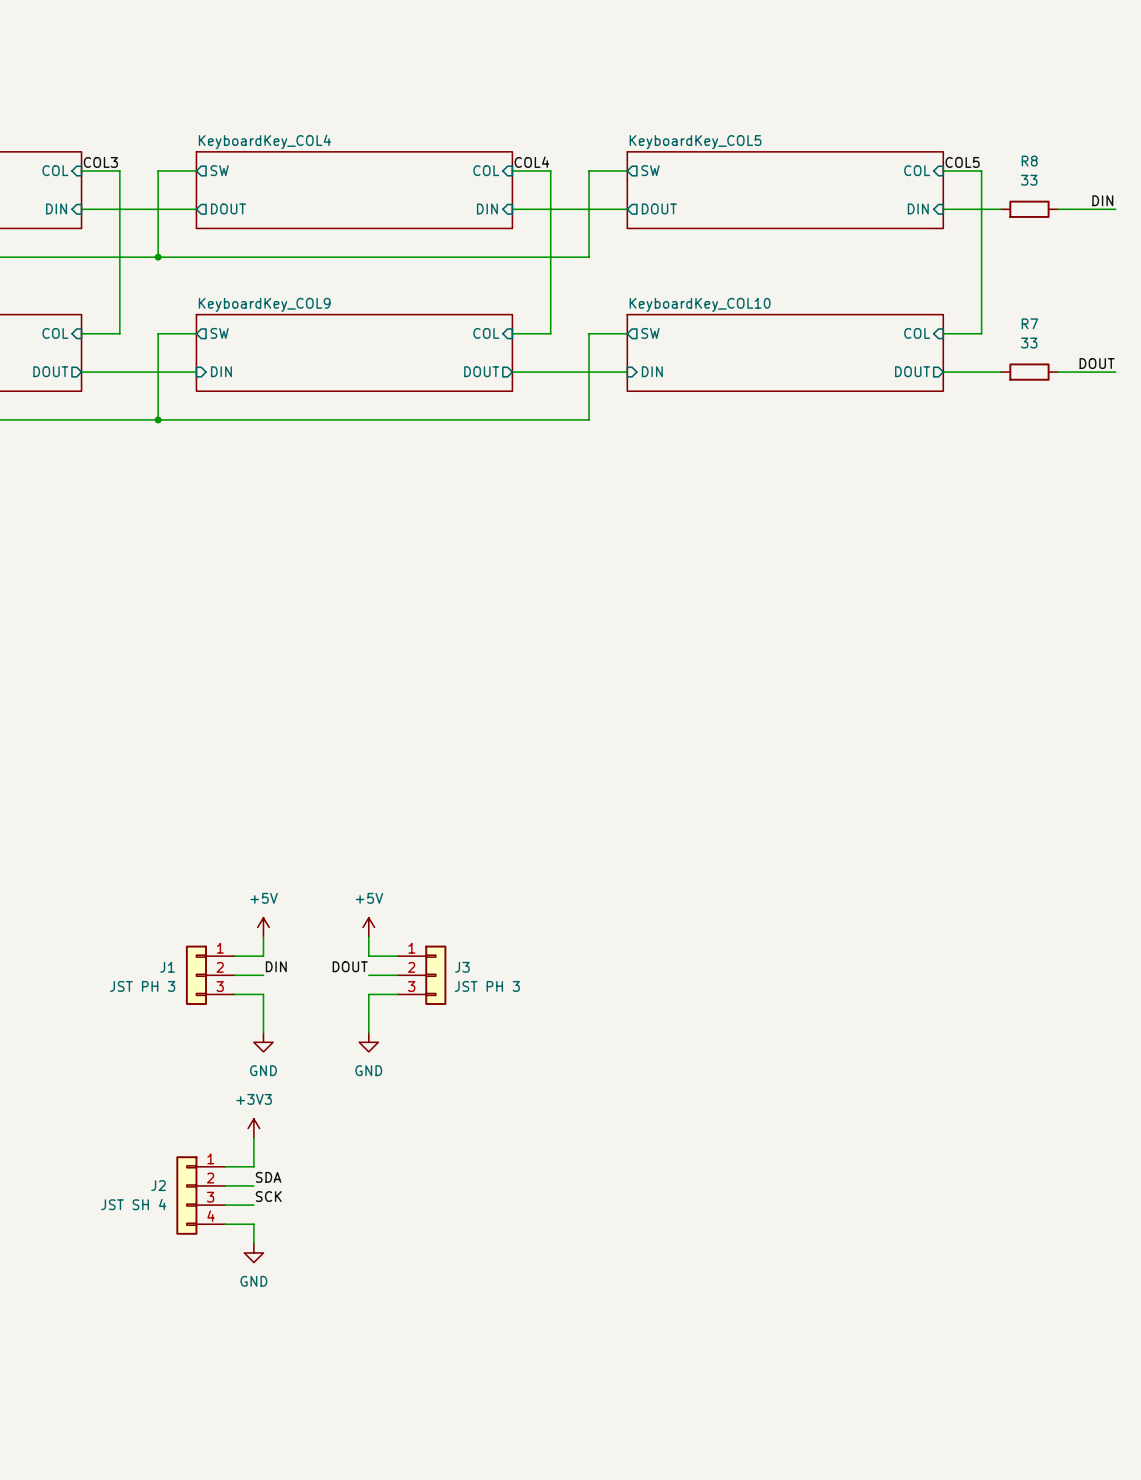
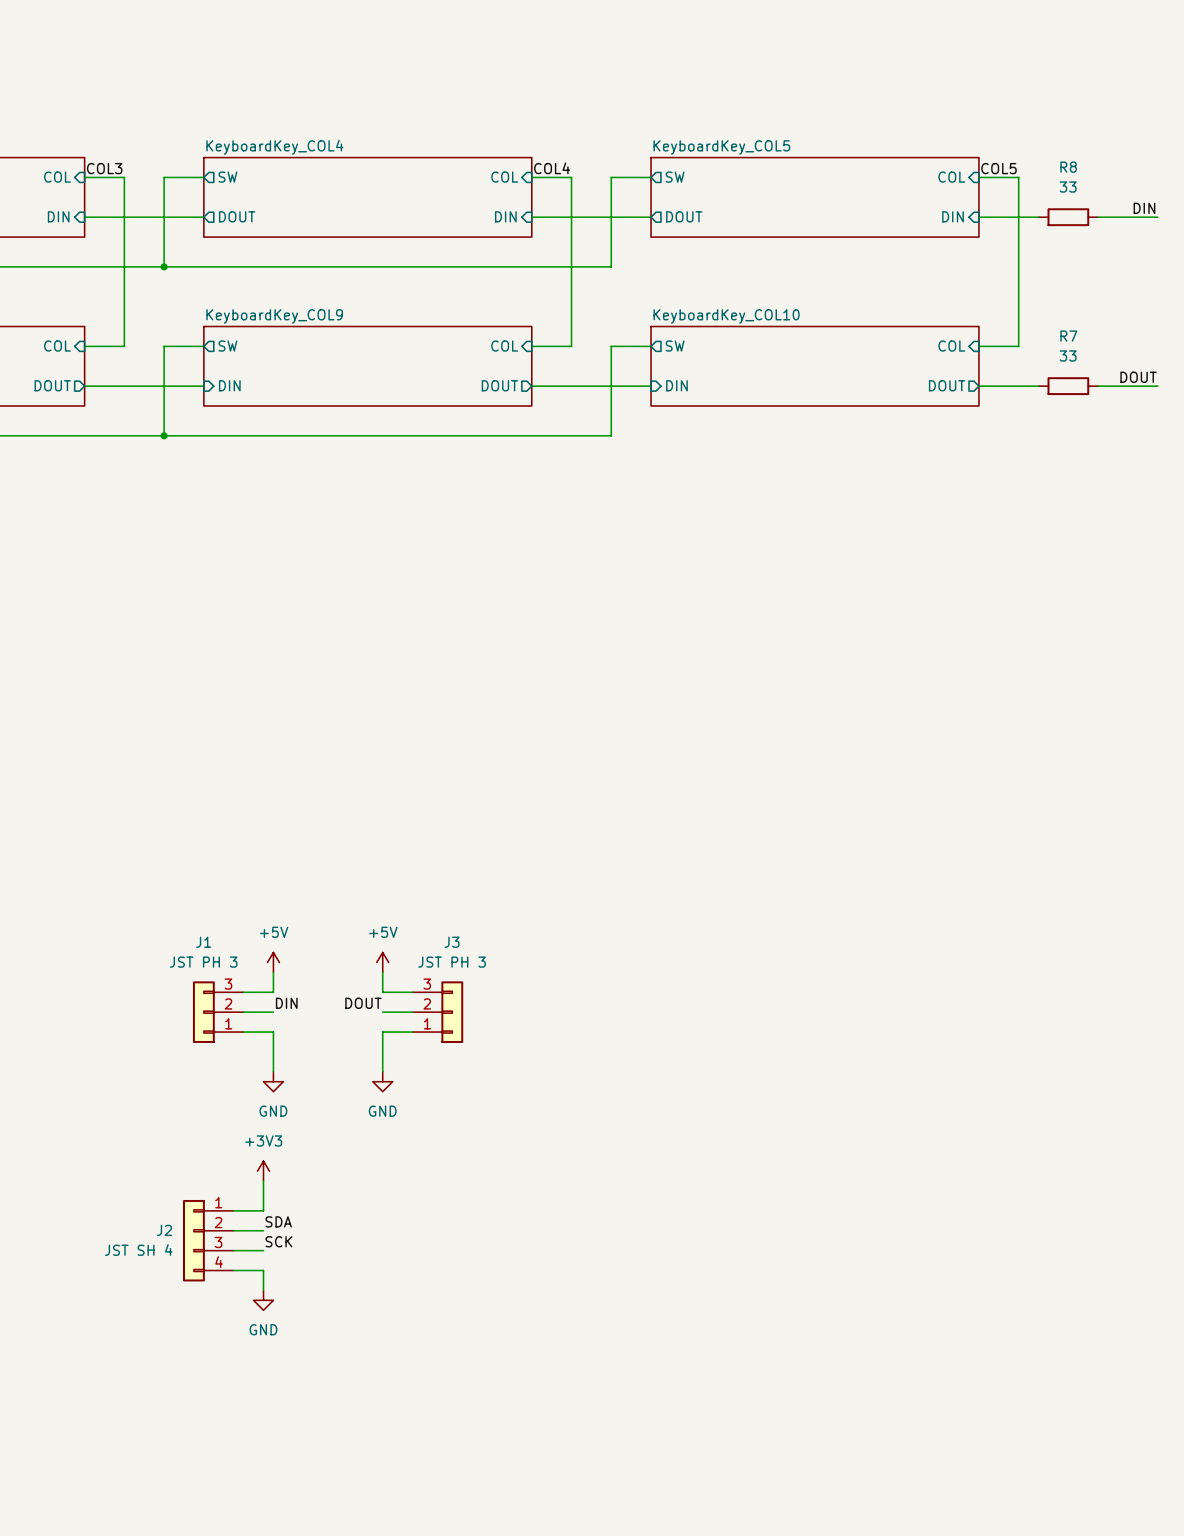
J1 name position: J1 (167, 967) -> J1 (203, 942)
J3 name position: J3 (462, 967) -> J3 (452, 942)
J1 flip: as is (196, 975) -> up-down (203, 1012)
J3 flip: as is (435, 975) -> up-down (452, 1012)
J1 value position: JST PH 3 (142, 986) -> JST PH 3 (203, 962)
J3 value position: JST PH 3 (487, 986) -> JST PH 3 (452, 962)

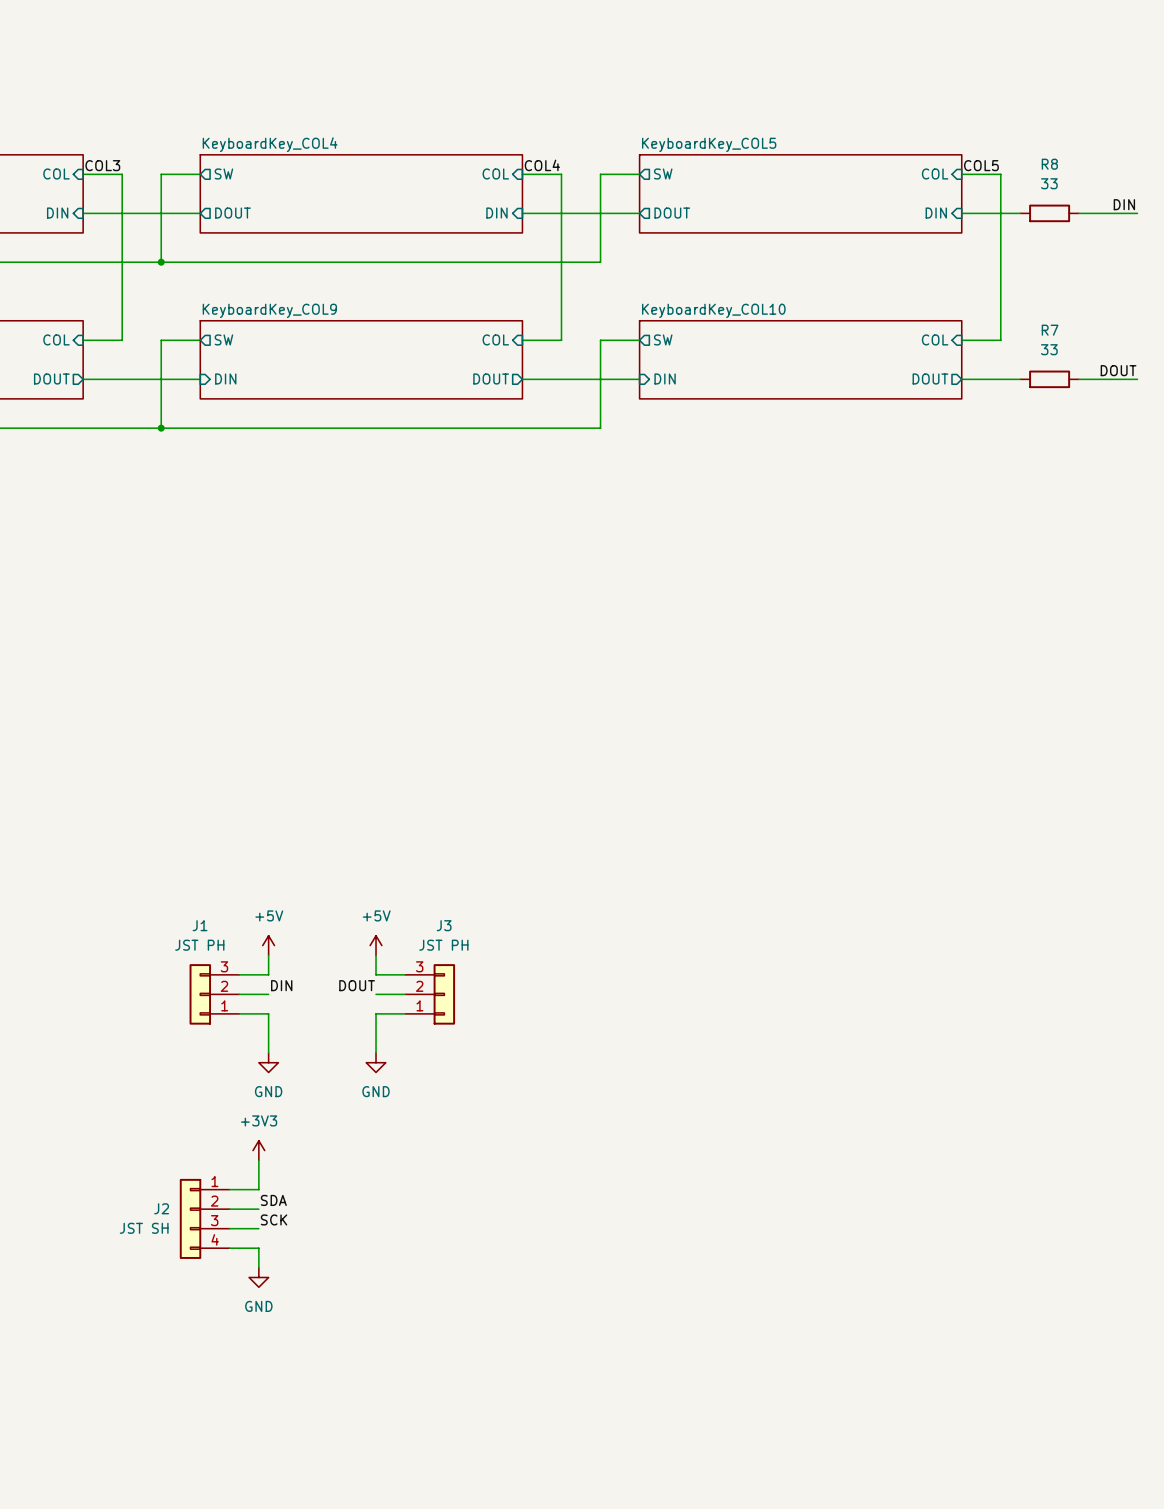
J1 value: JST PH 3 (203, 962) -> JST PH (199, 945)
J3 value: JST PH 3 (452, 962) -> JST PH (443, 945)
J2 value: JST SH 4 (138, 1250) -> JST SH (144, 1228)

